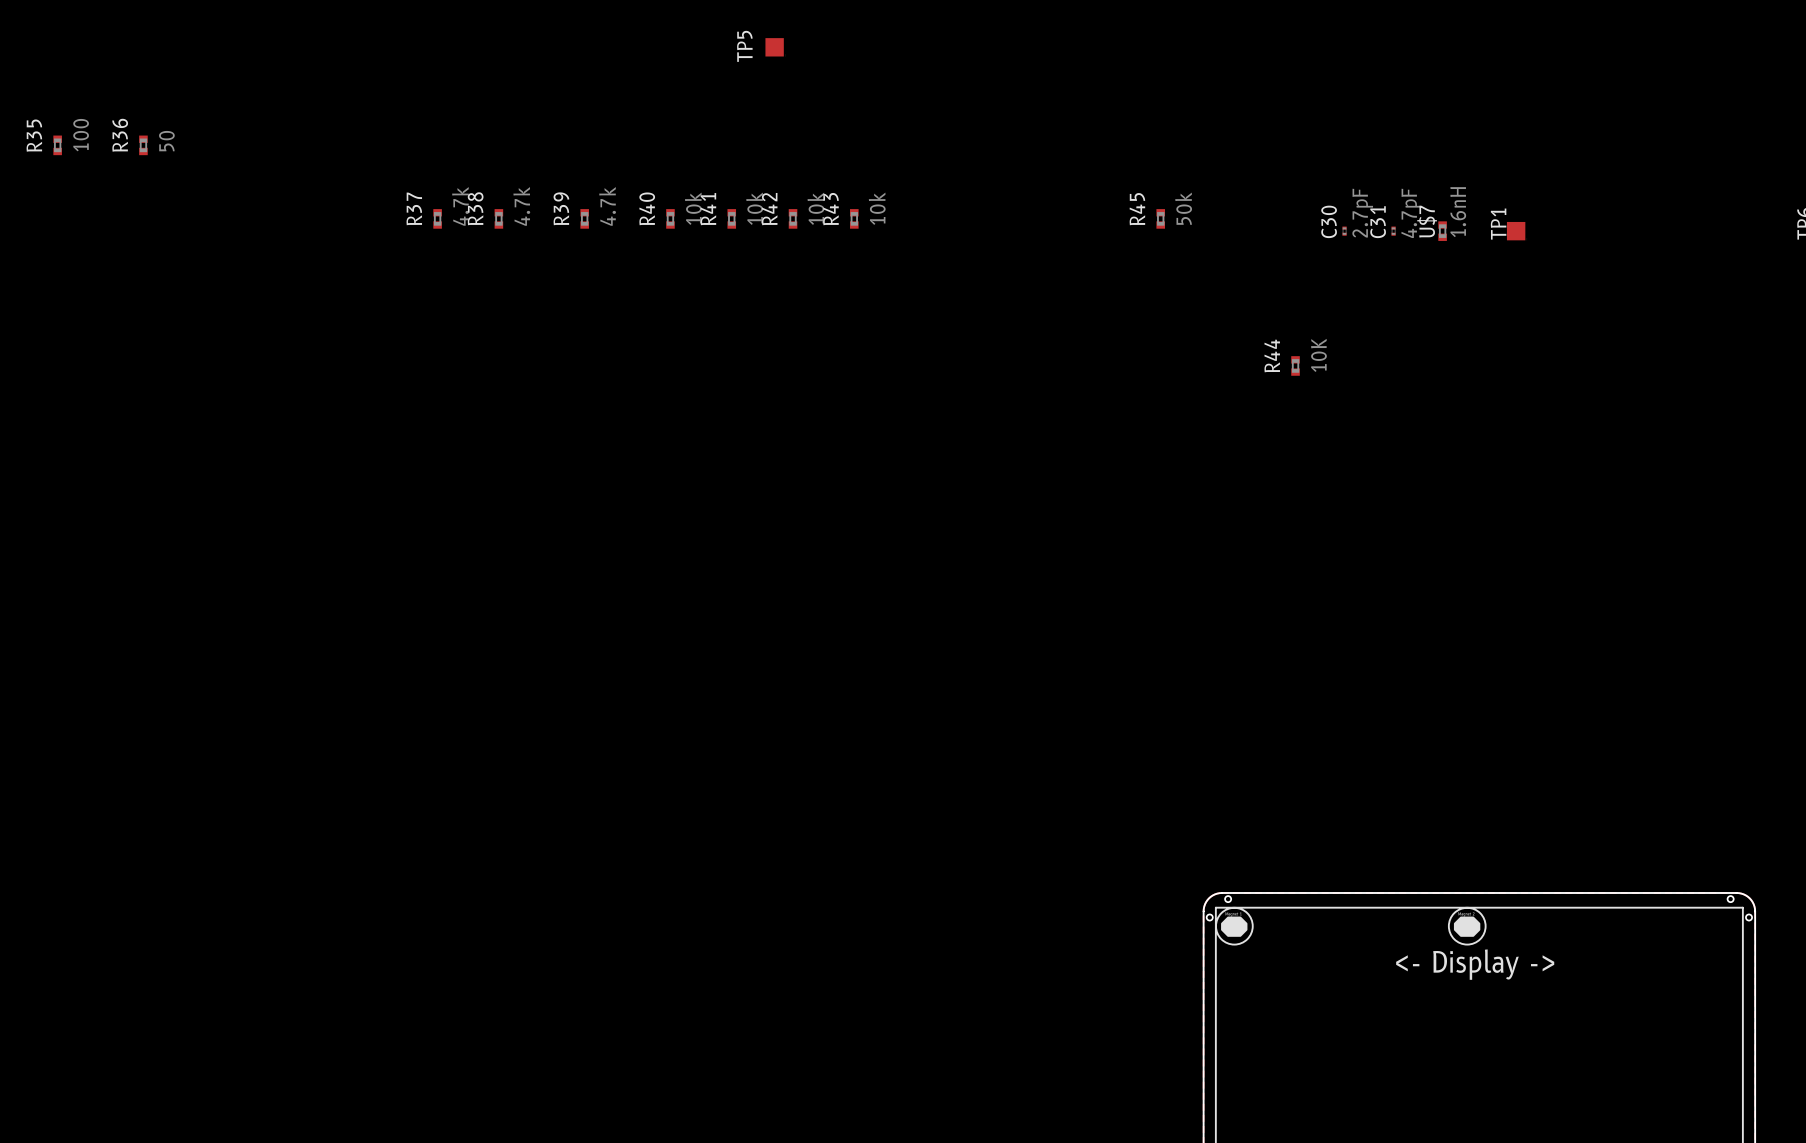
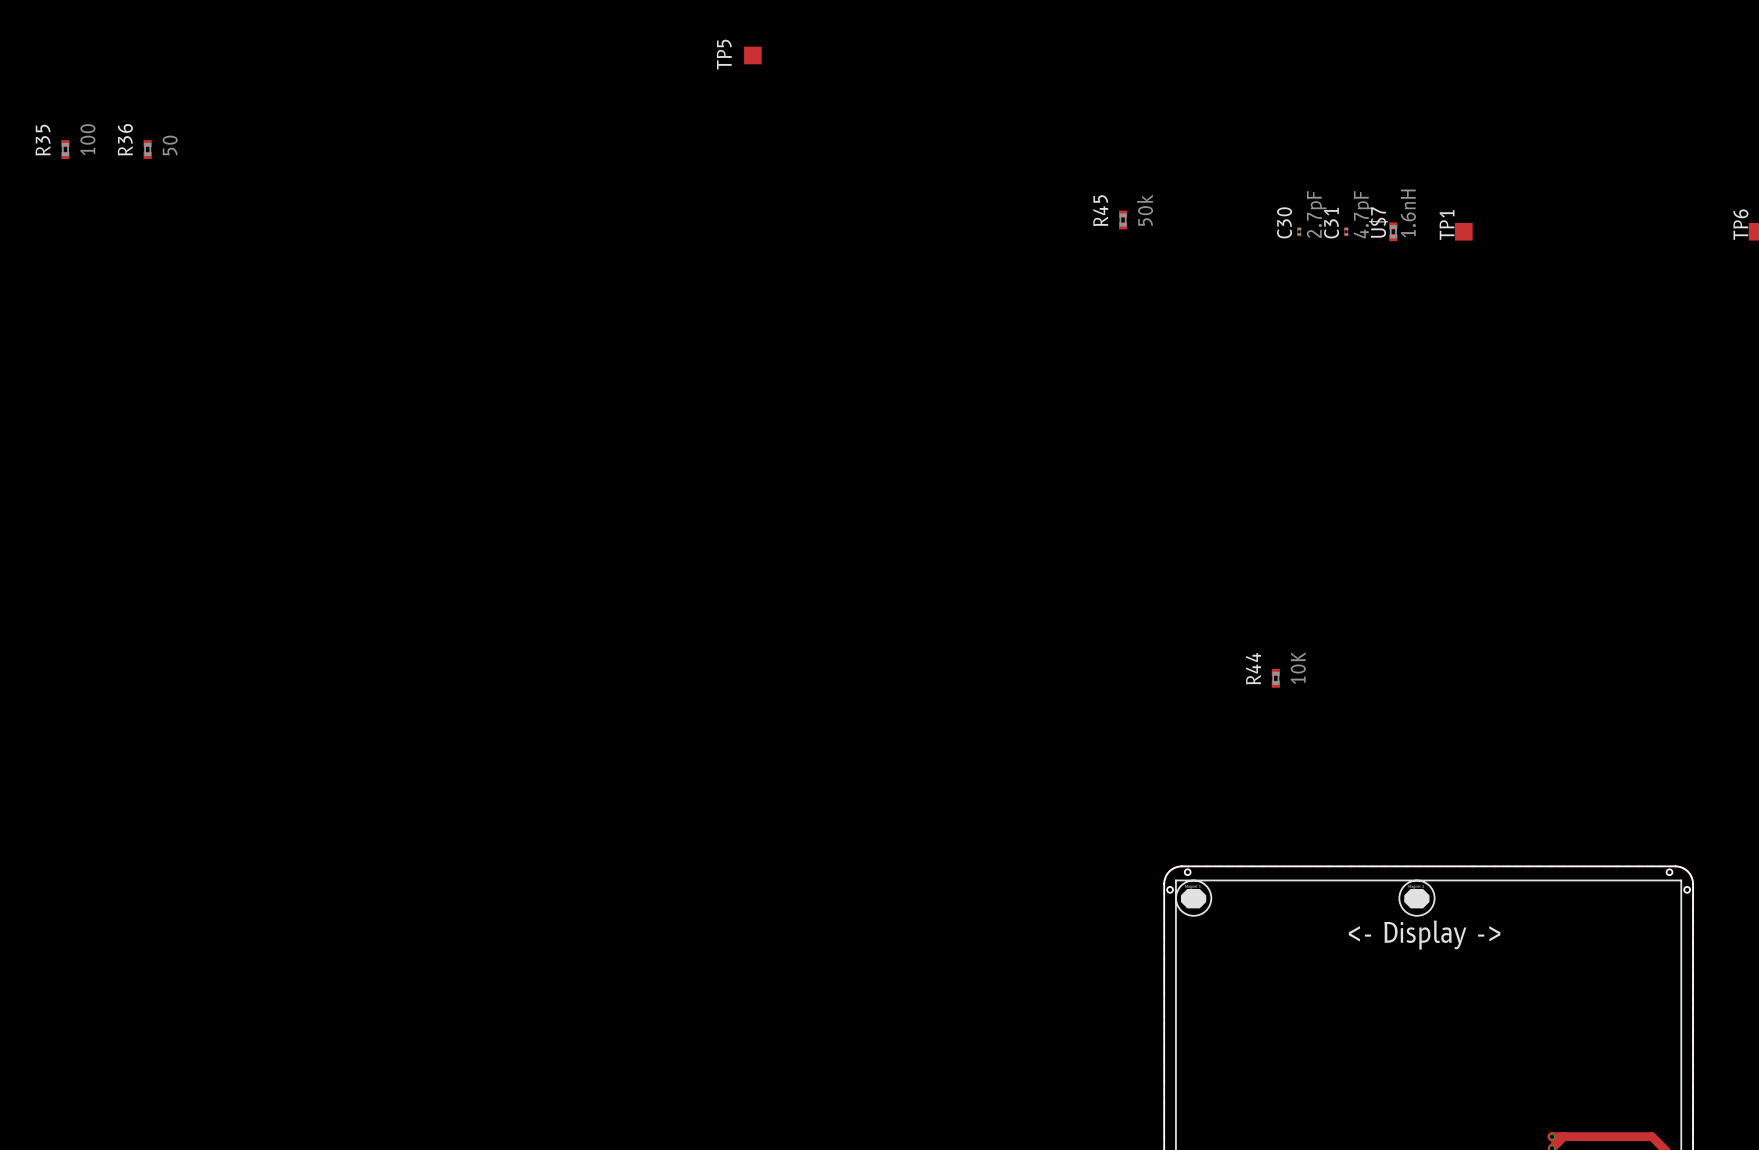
R37: 4.7k (437, 218) -> none
R38: 4.7k (498, 218) -> none
R39: 4.7k (584, 218) -> none
R40: 10k (670, 218) -> none
R41: 10k (731, 218) -> none
R42: 10k (793, 218) -> none
R43: 10k (854, 218) -> none
R44 position: (1295, 365) -> (1275, 678)

